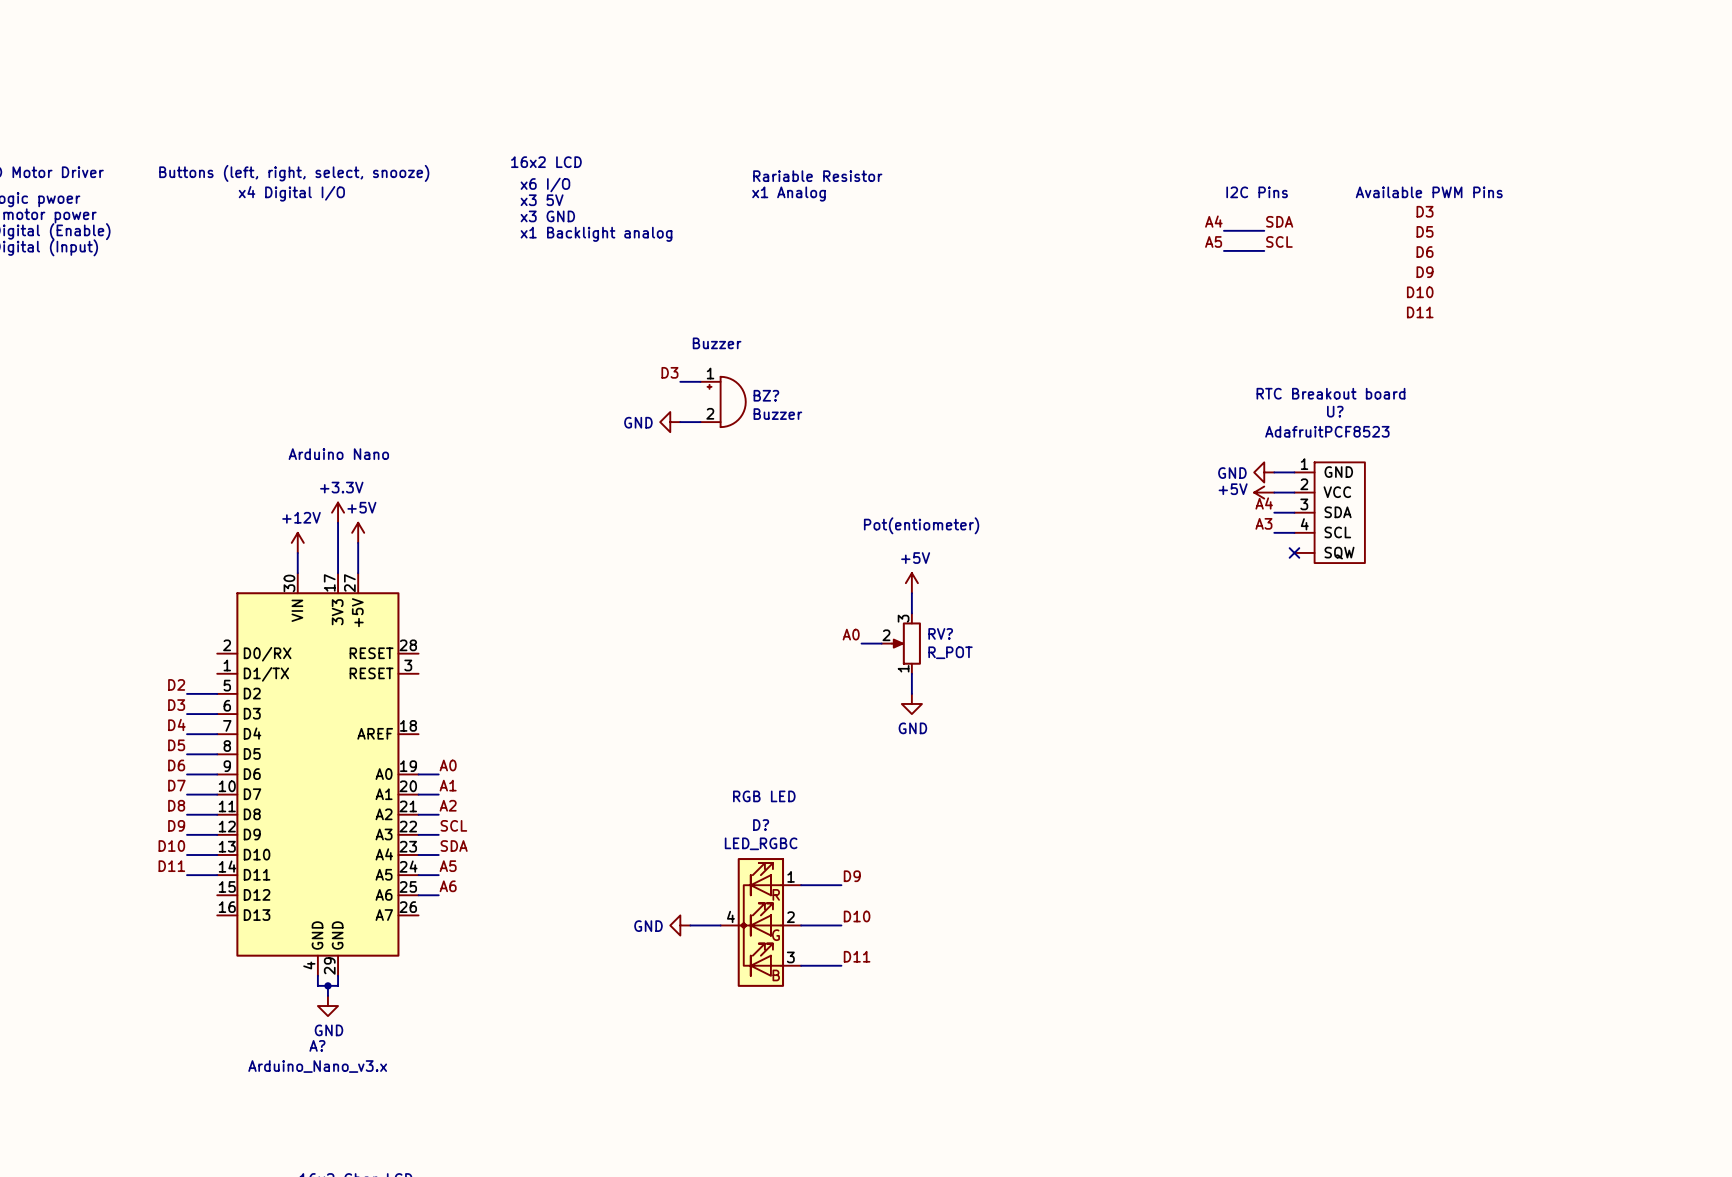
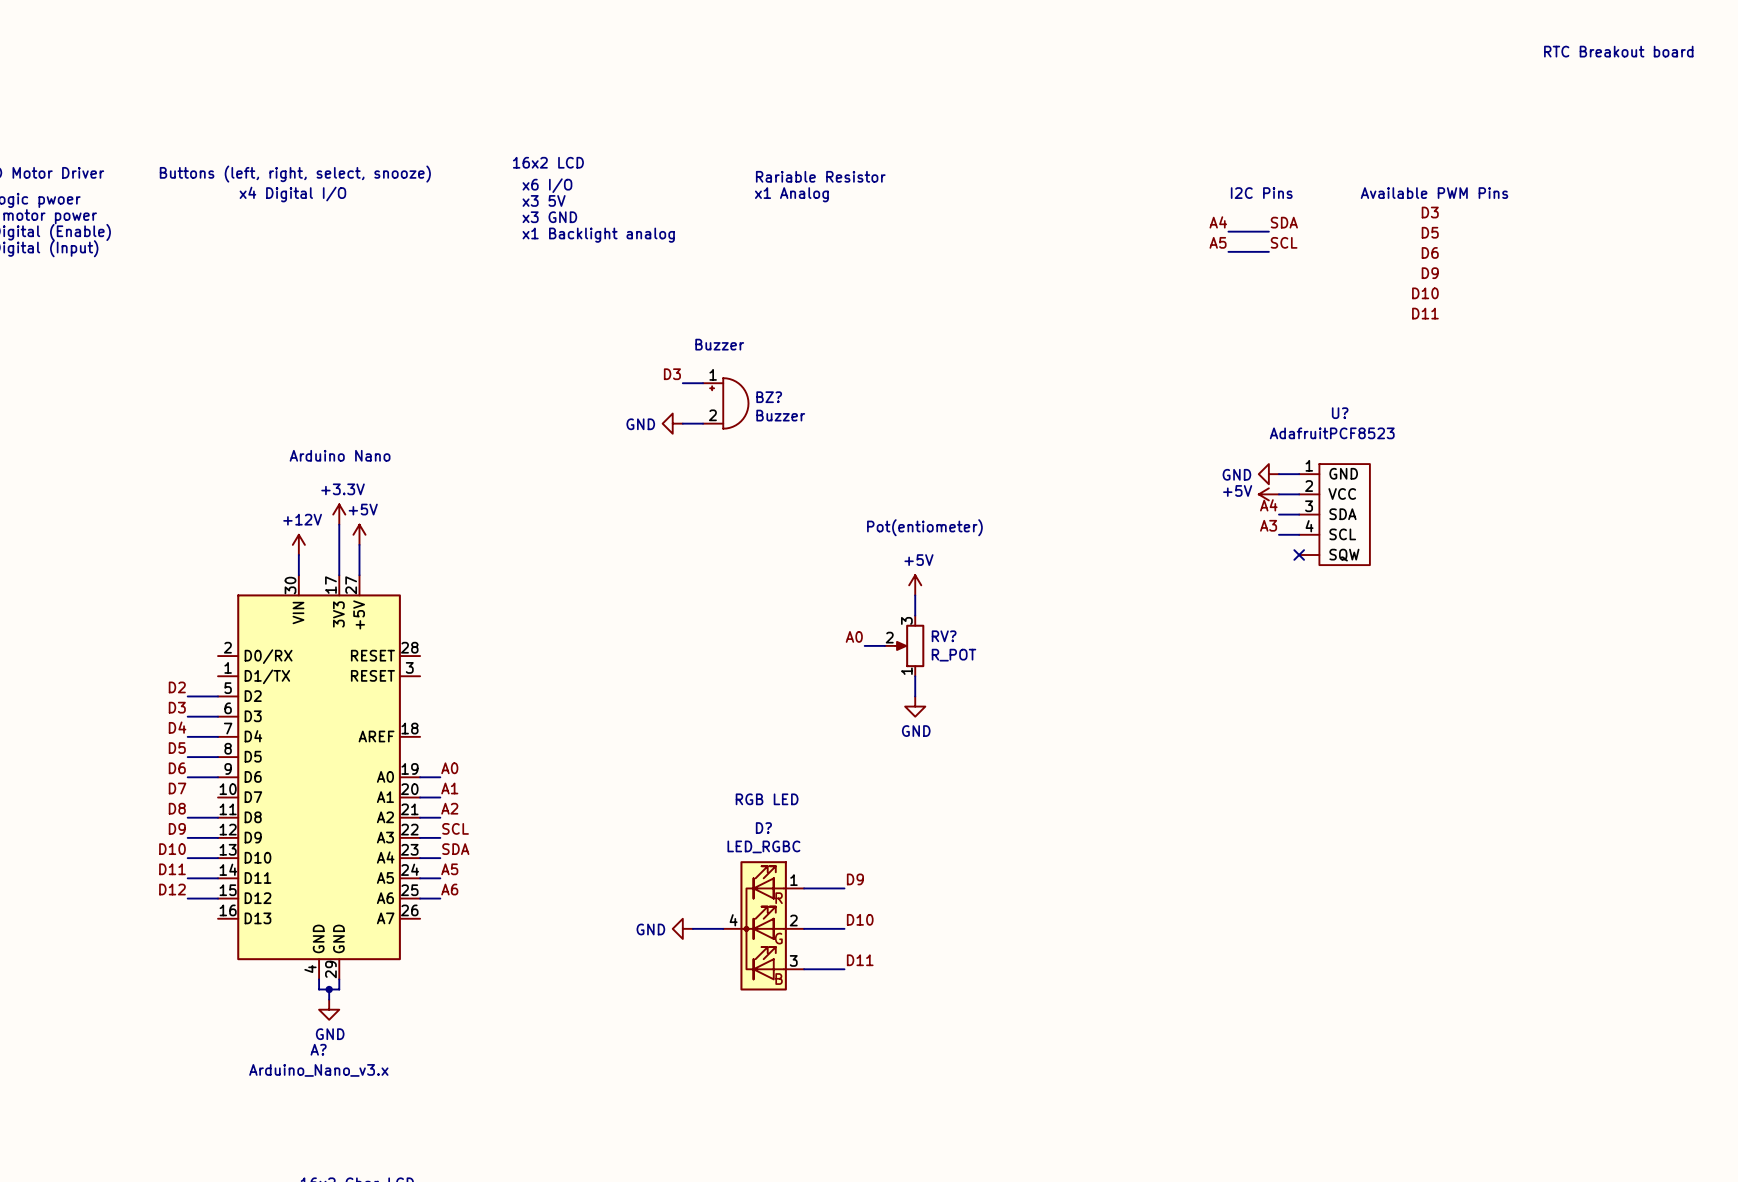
text: none -> RTC Breakout board (1618, 51)
text: RTC Breakout board (1330, 393) -> none
wire: (187, 794) (217, 794) -> (187, 898) (218, 898)
label: none -> D12 (172, 889)

